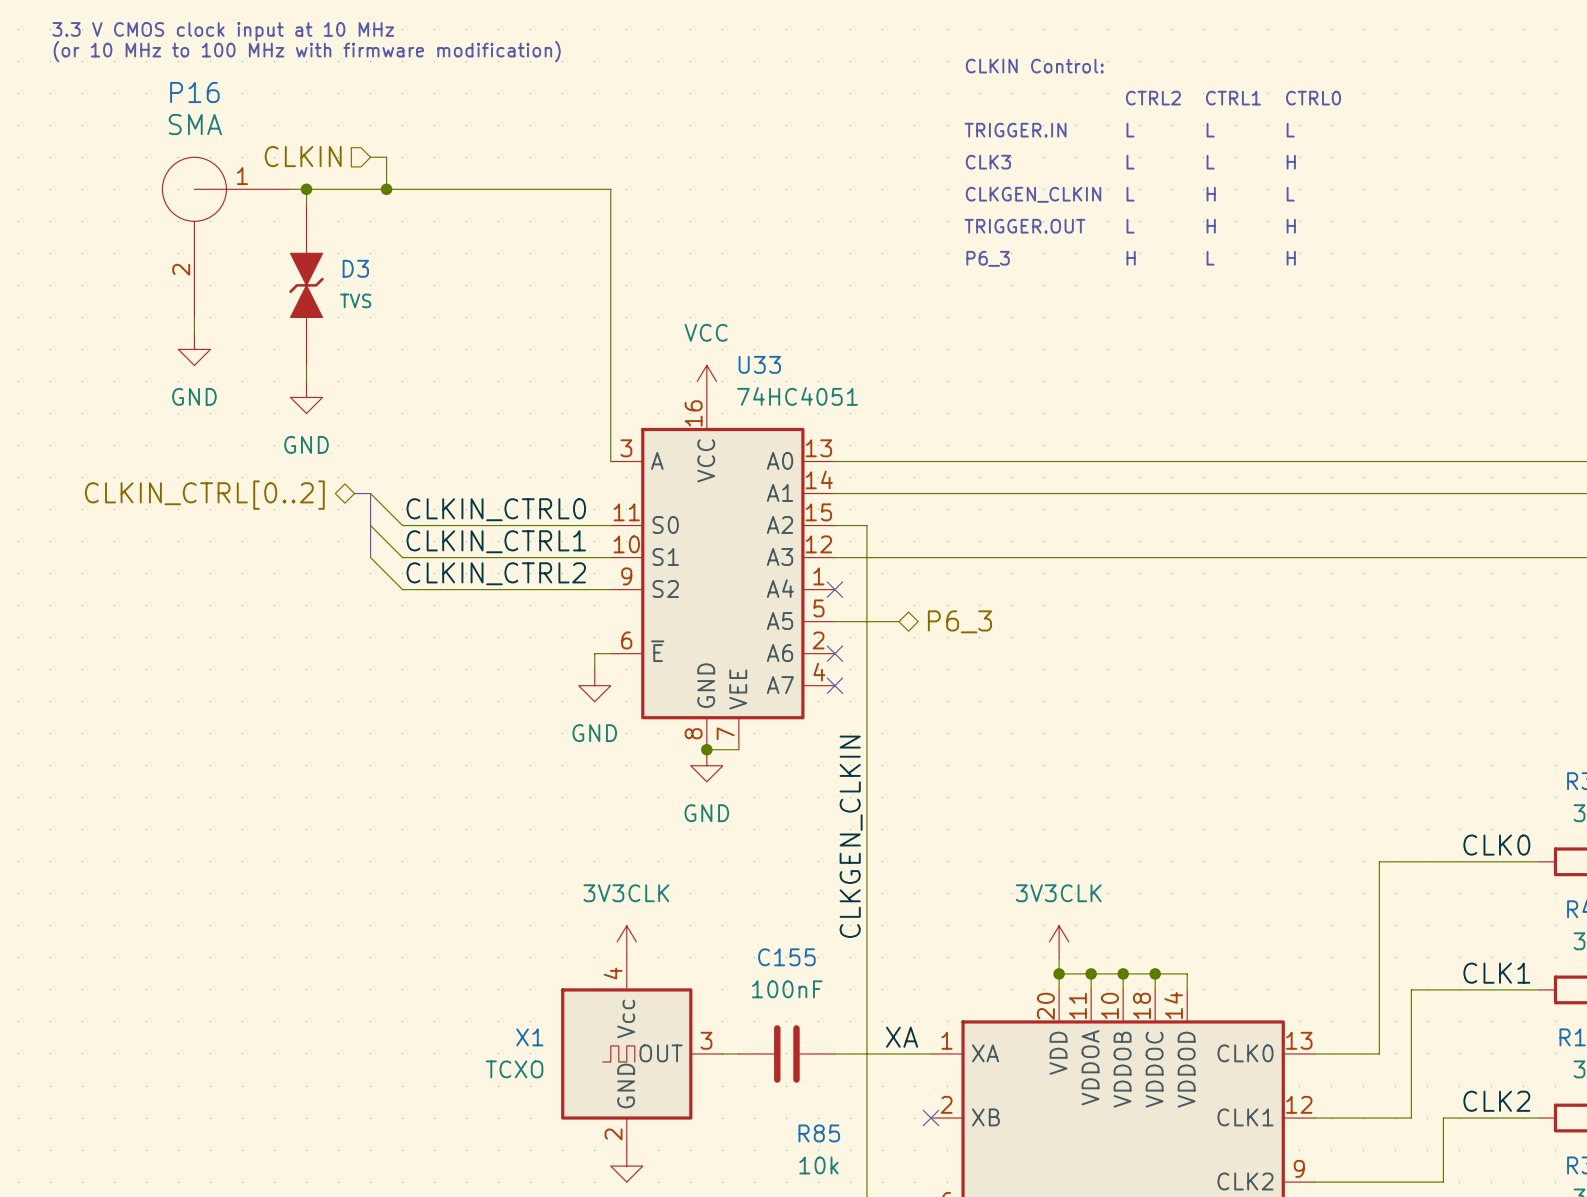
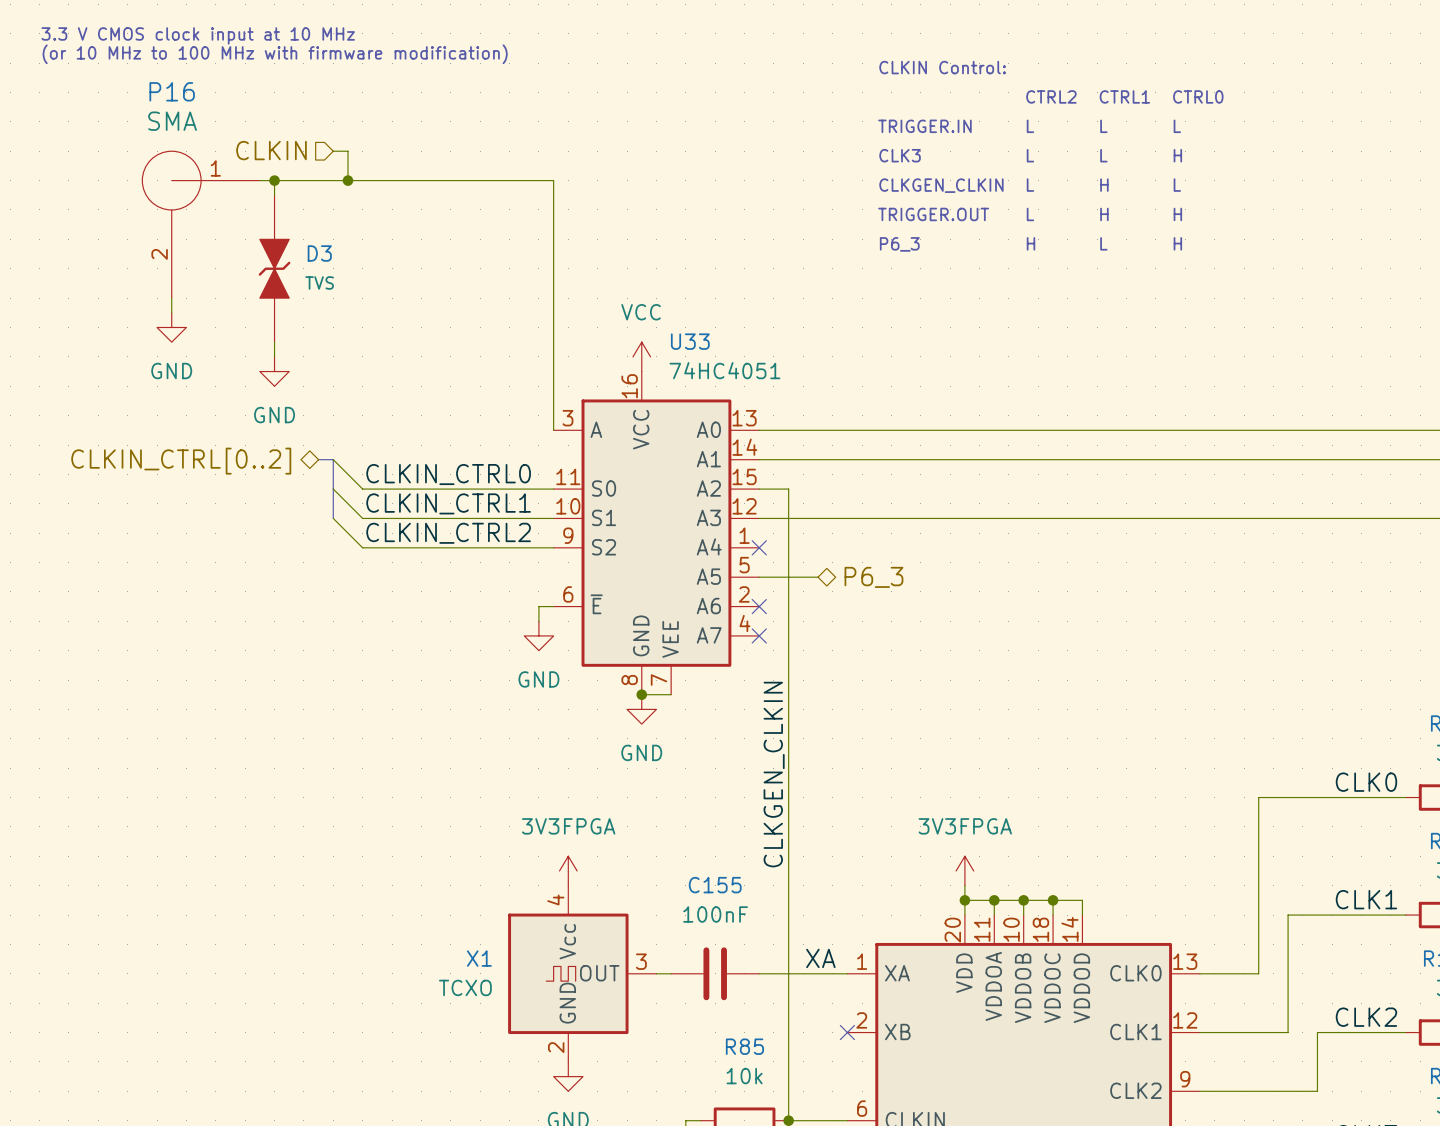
power symbol: 3V3CLK (626, 941) -> 3V3FPGA (568, 870)
power symbol: 3V3CLK (1059, 941) -> 3V3FPGA (964, 870)

